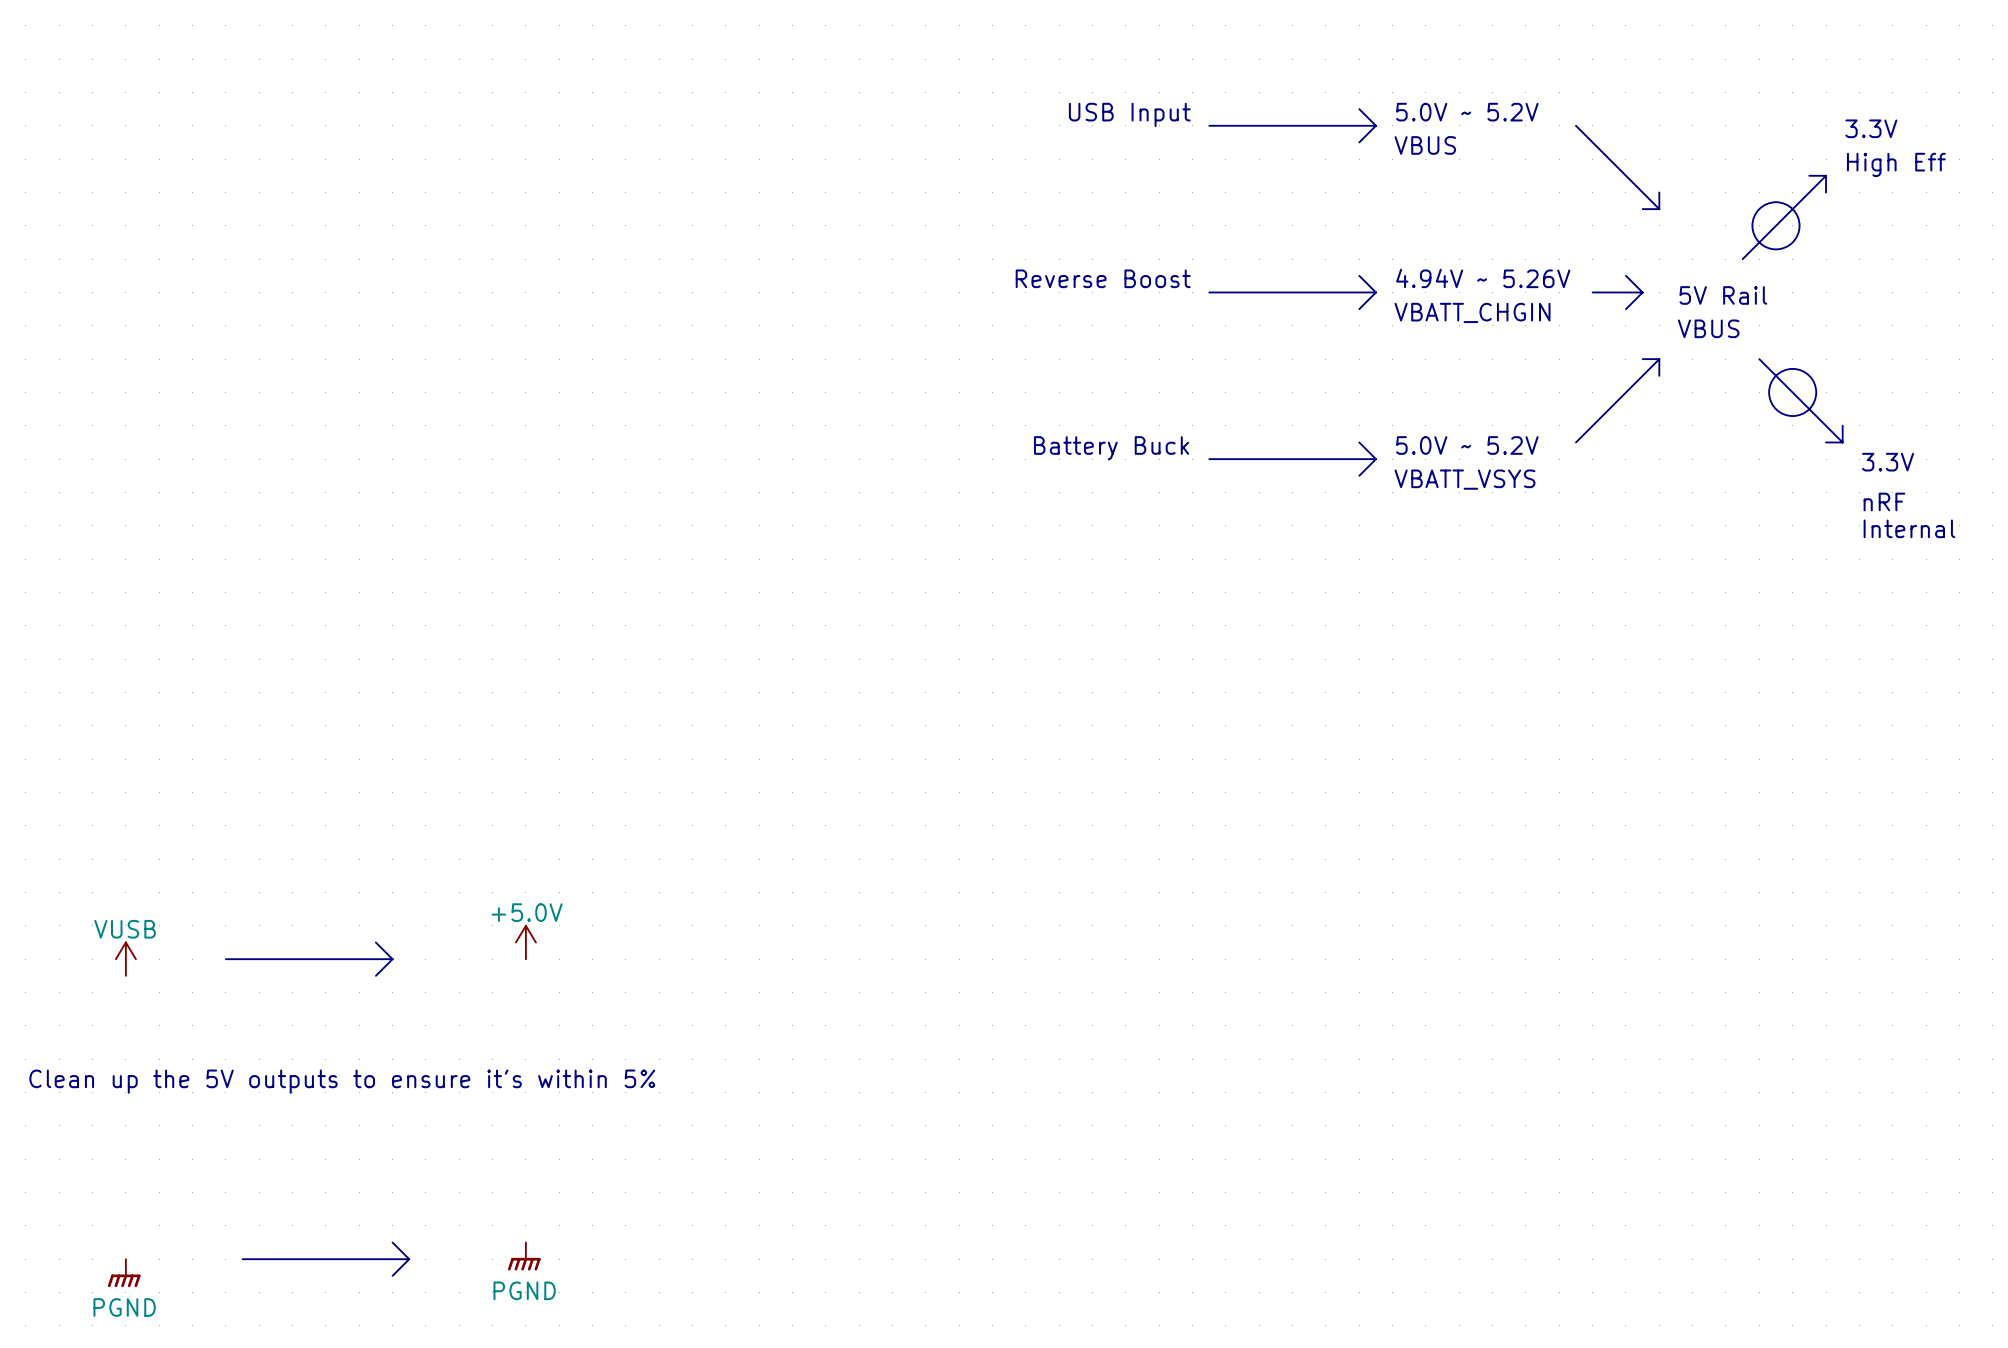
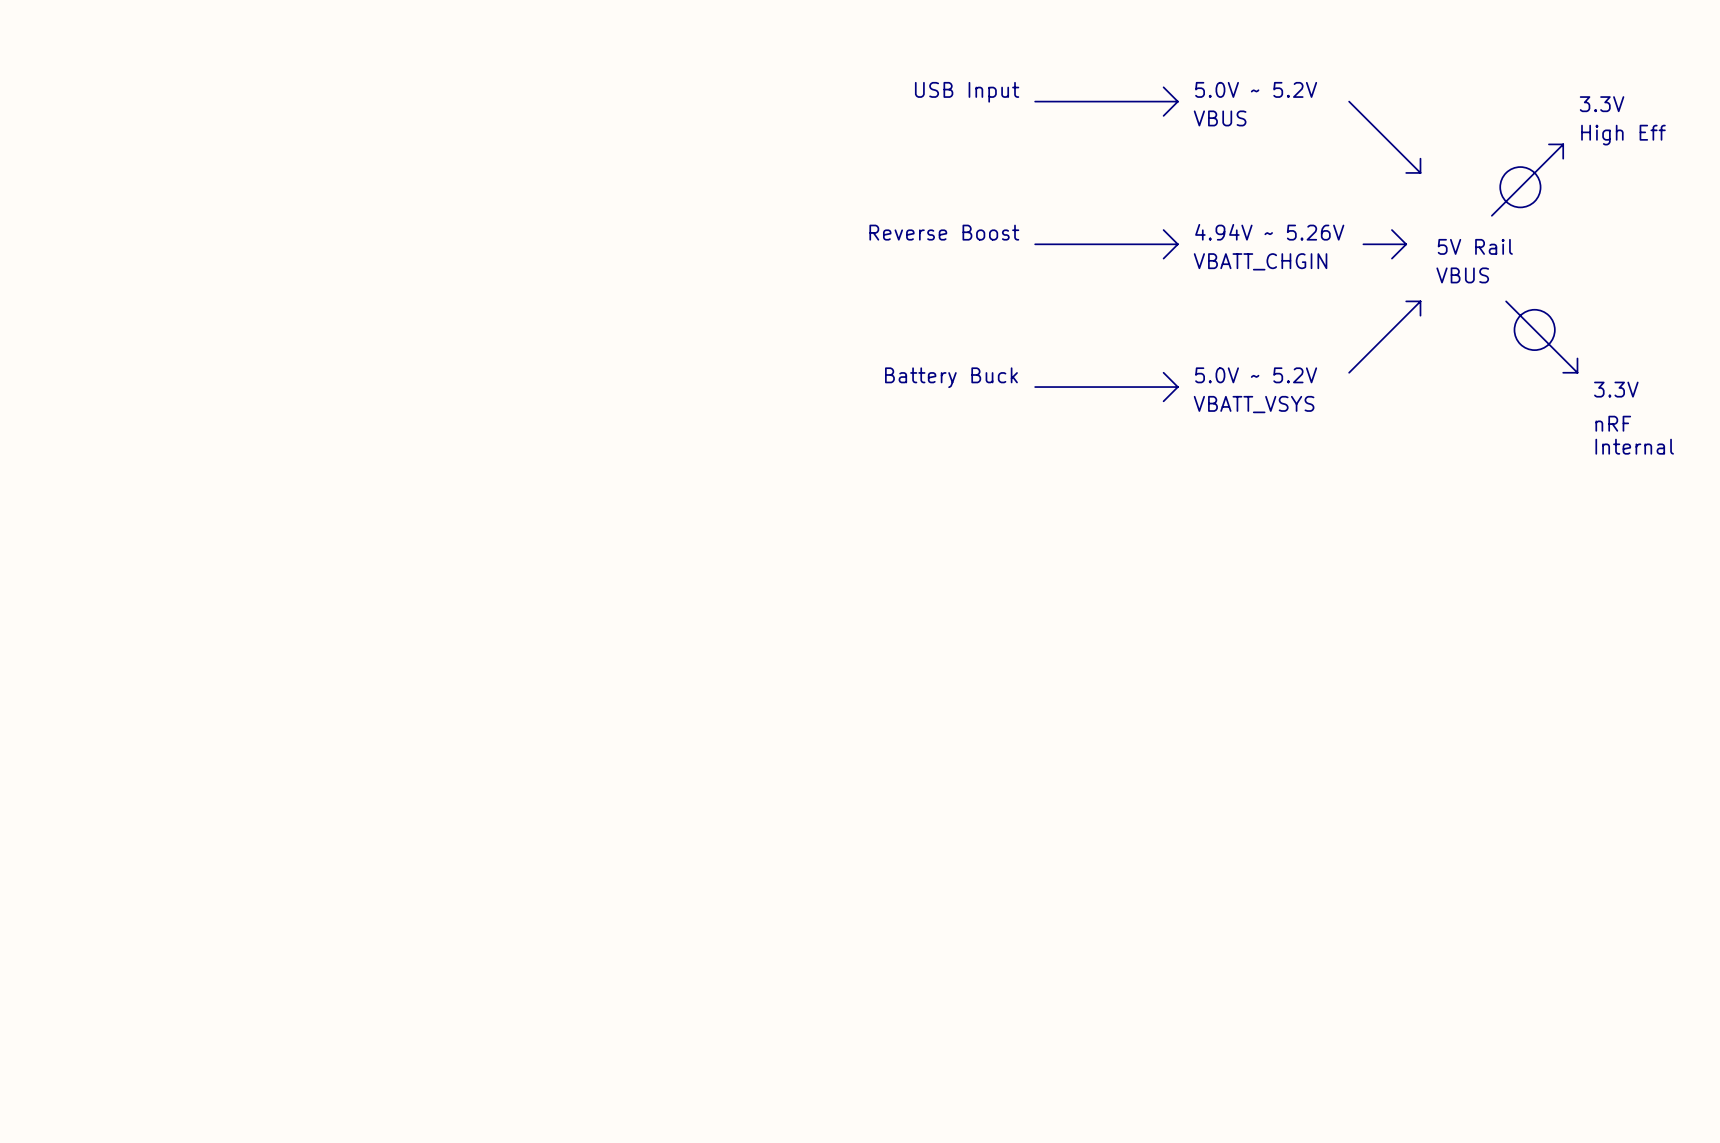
line: (375, 942) (392, 959) -> none
power symbol: +5.0V (525, 942) -> none
power symbol: VUSB (125, 959) -> none
line: (225, 959) (392, 959) -> none
line: (392, 959) (375, 975) -> none
text: Clean up the 5V outputs to ensure it's within 5% (342, 1081) -> none
line: (392, 1242) (409, 1259) -> none
power symbol: PGND (524, 1256) -> none
line: (242, 1259) (409, 1259) -> none
line: (409, 1259) (392, 1275) -> none
power symbol: PGND (124, 1273) -> none

